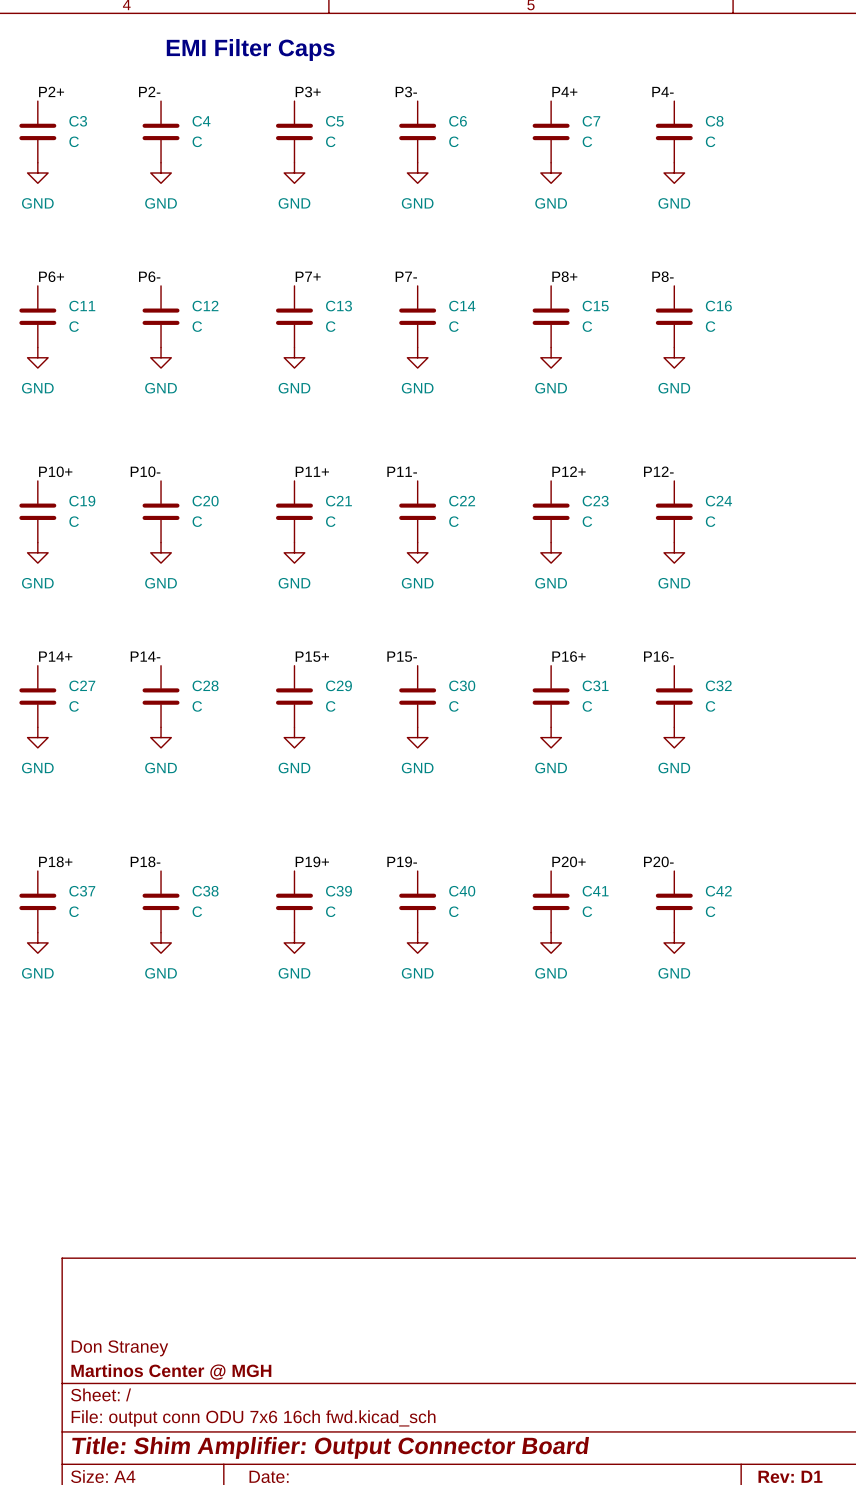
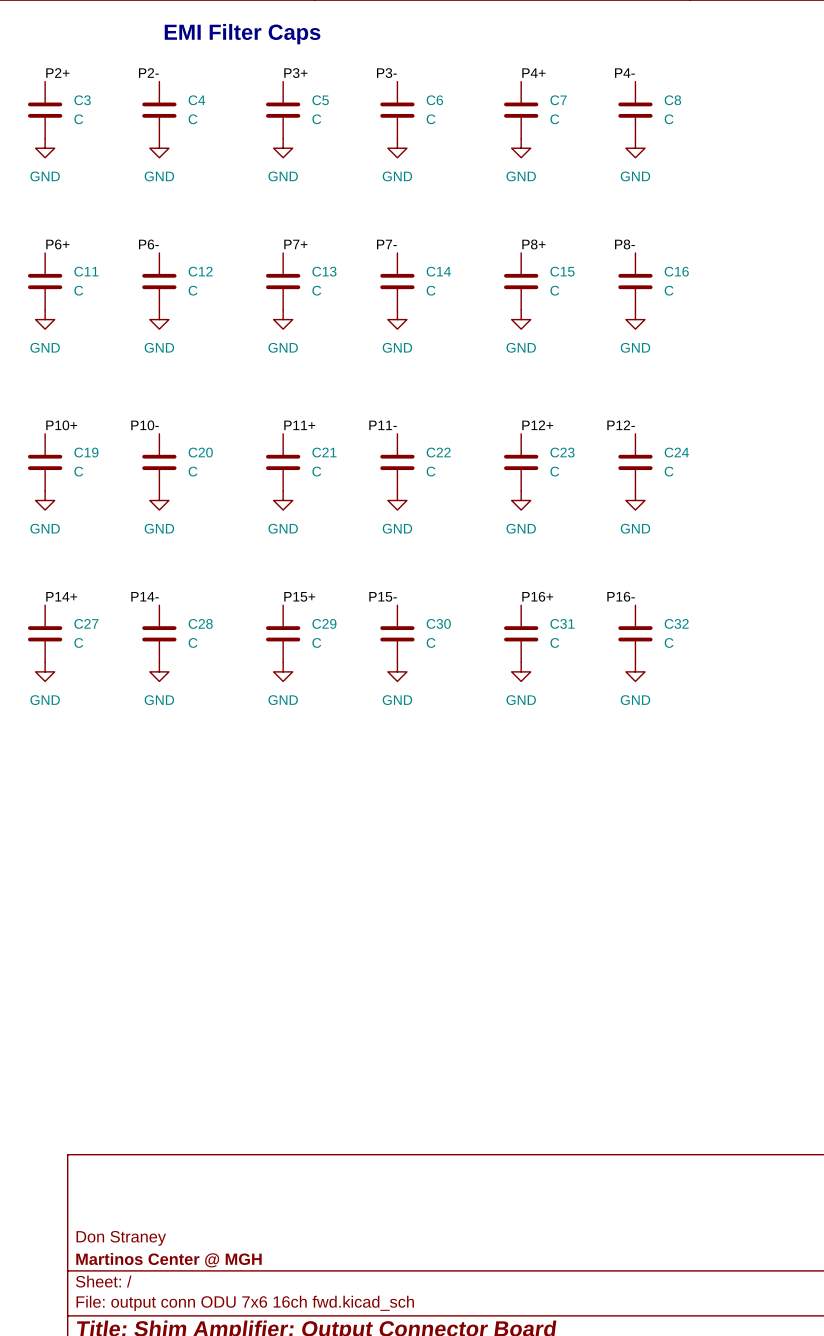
label: P18+ (55, 861) -> none
label: P18- (145, 861) -> none
label: P19+ (312, 861) -> none
label: P19- (402, 861) -> none
label: P20+ (568, 861) -> none
label: P20- (658, 861) -> none
C37: C (37, 901) -> none
C38: C (161, 901) -> none
C39: C (294, 901) -> none
C40: C (417, 901) -> none
C41: C (551, 901) -> none
C42: C (674, 901) -> none
power symbol: GND (37, 942) -> none
power symbol: GND (161, 942) -> none
power symbol: GND (294, 942) -> none
power symbol: GND (417, 942) -> none
power symbol: GND (551, 942) -> none
power symbol: GND (674, 942) -> none

